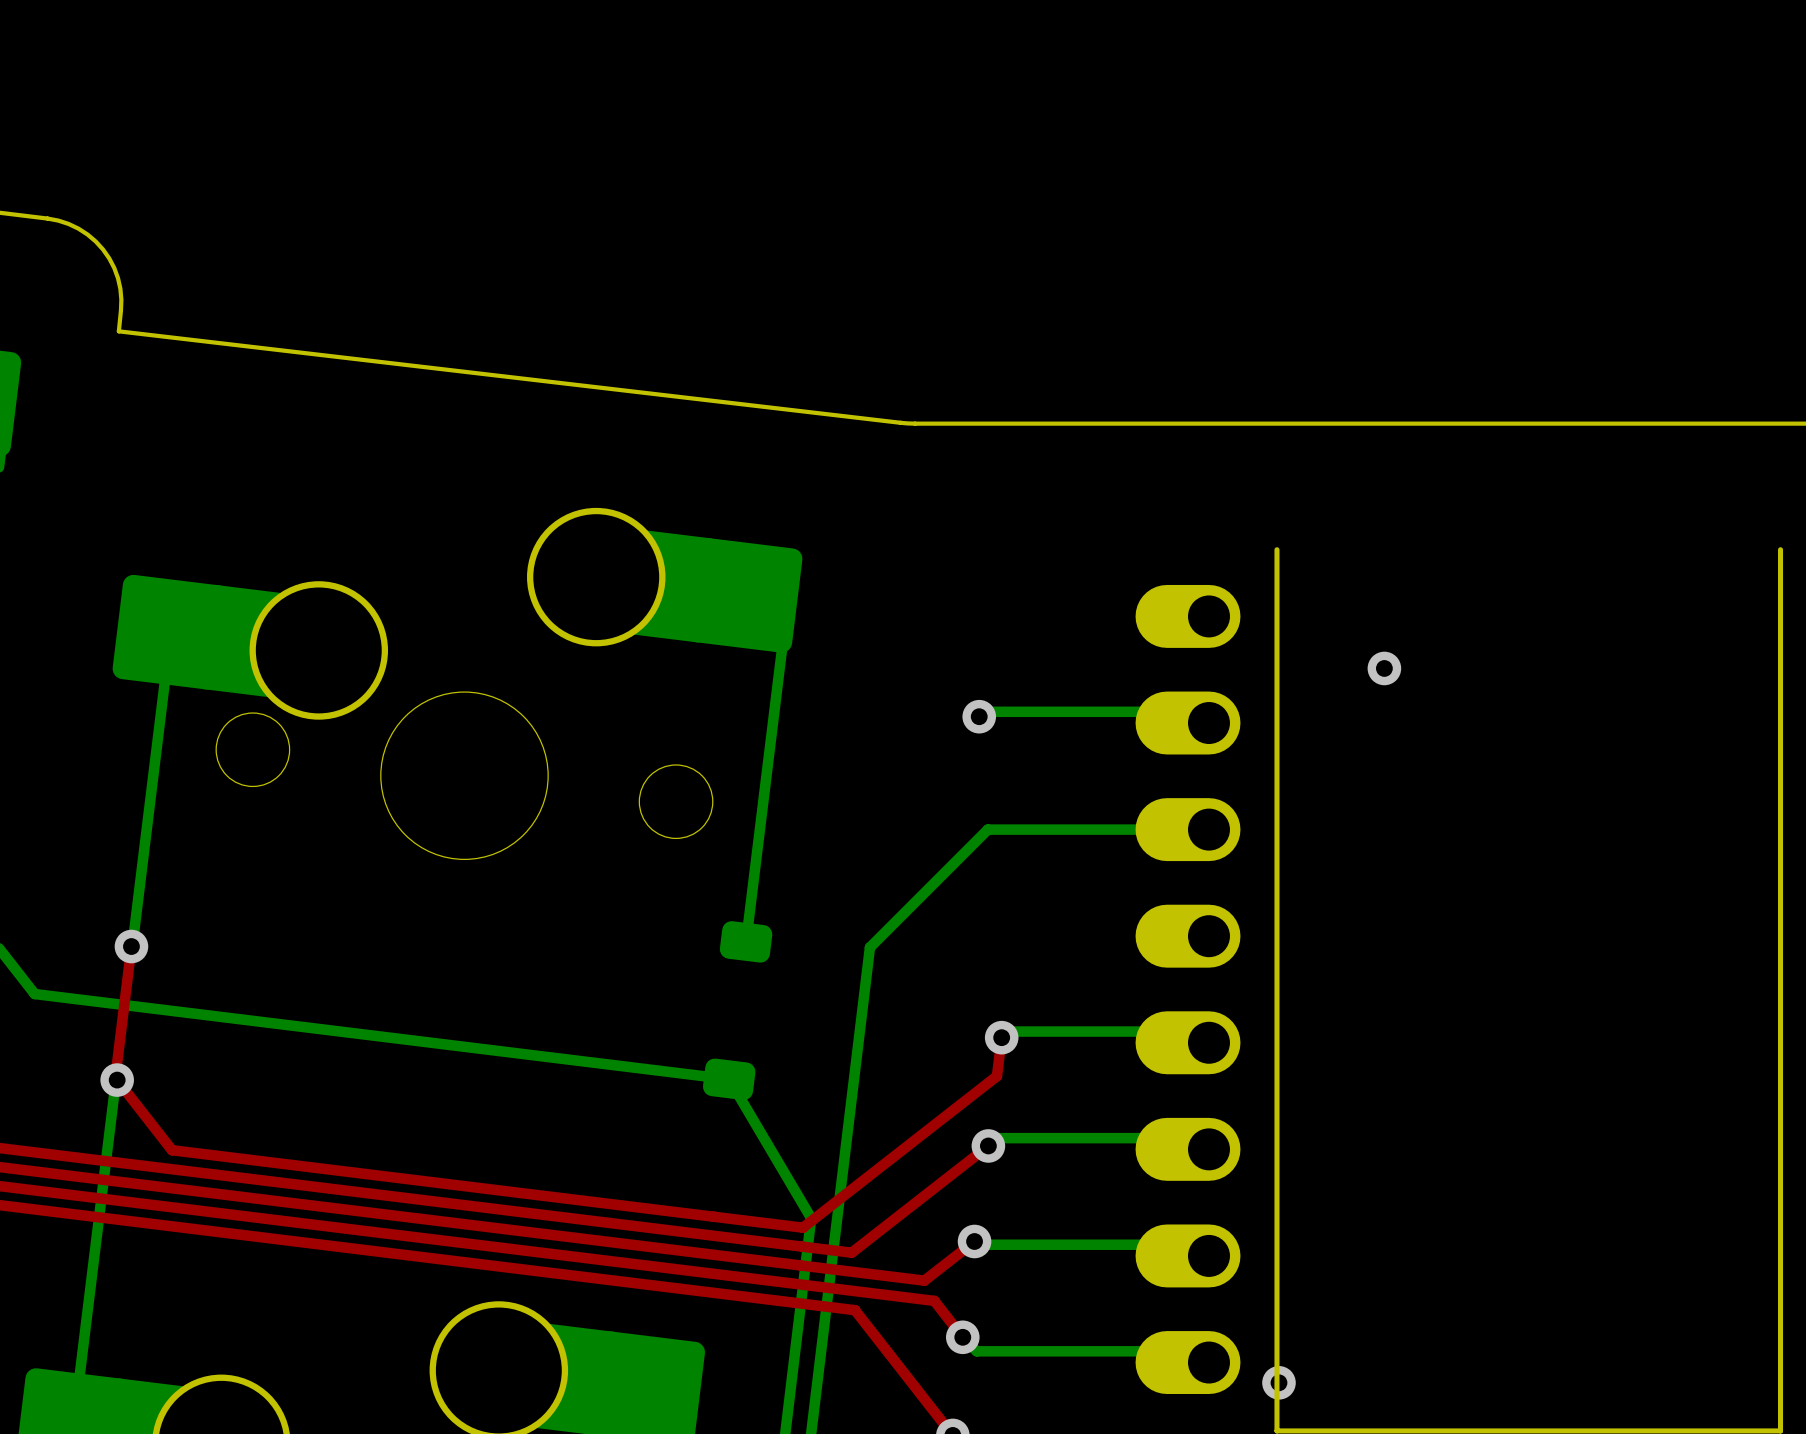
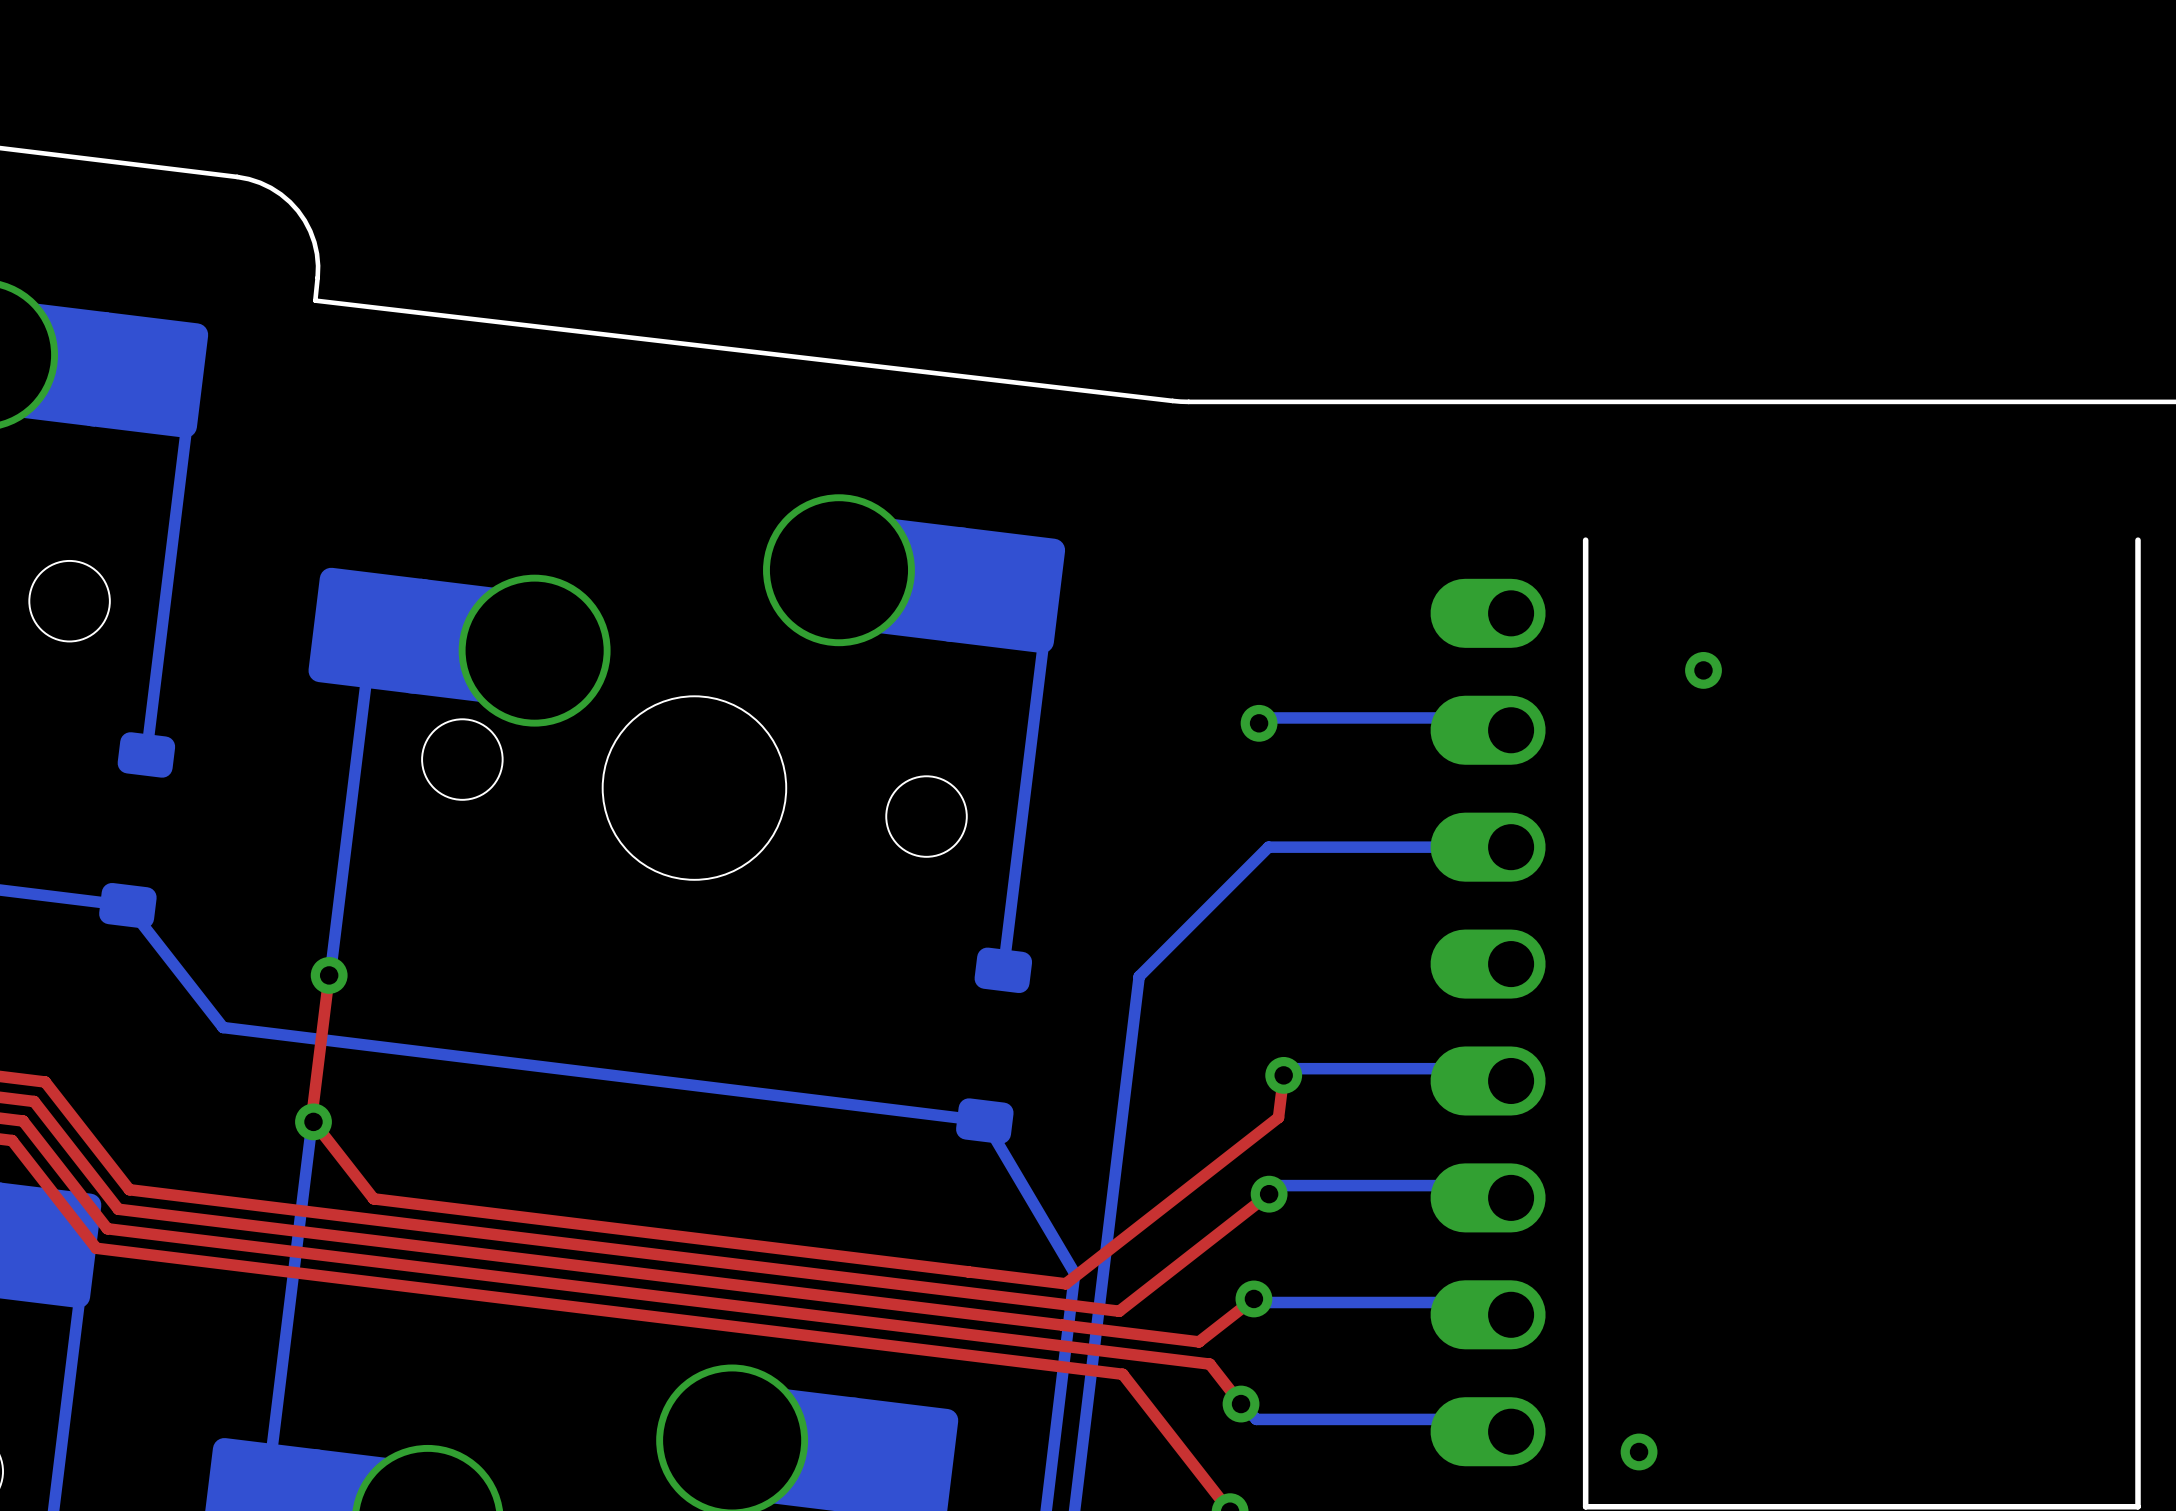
via position: (1278, 1382) -> (1639, 1451)

